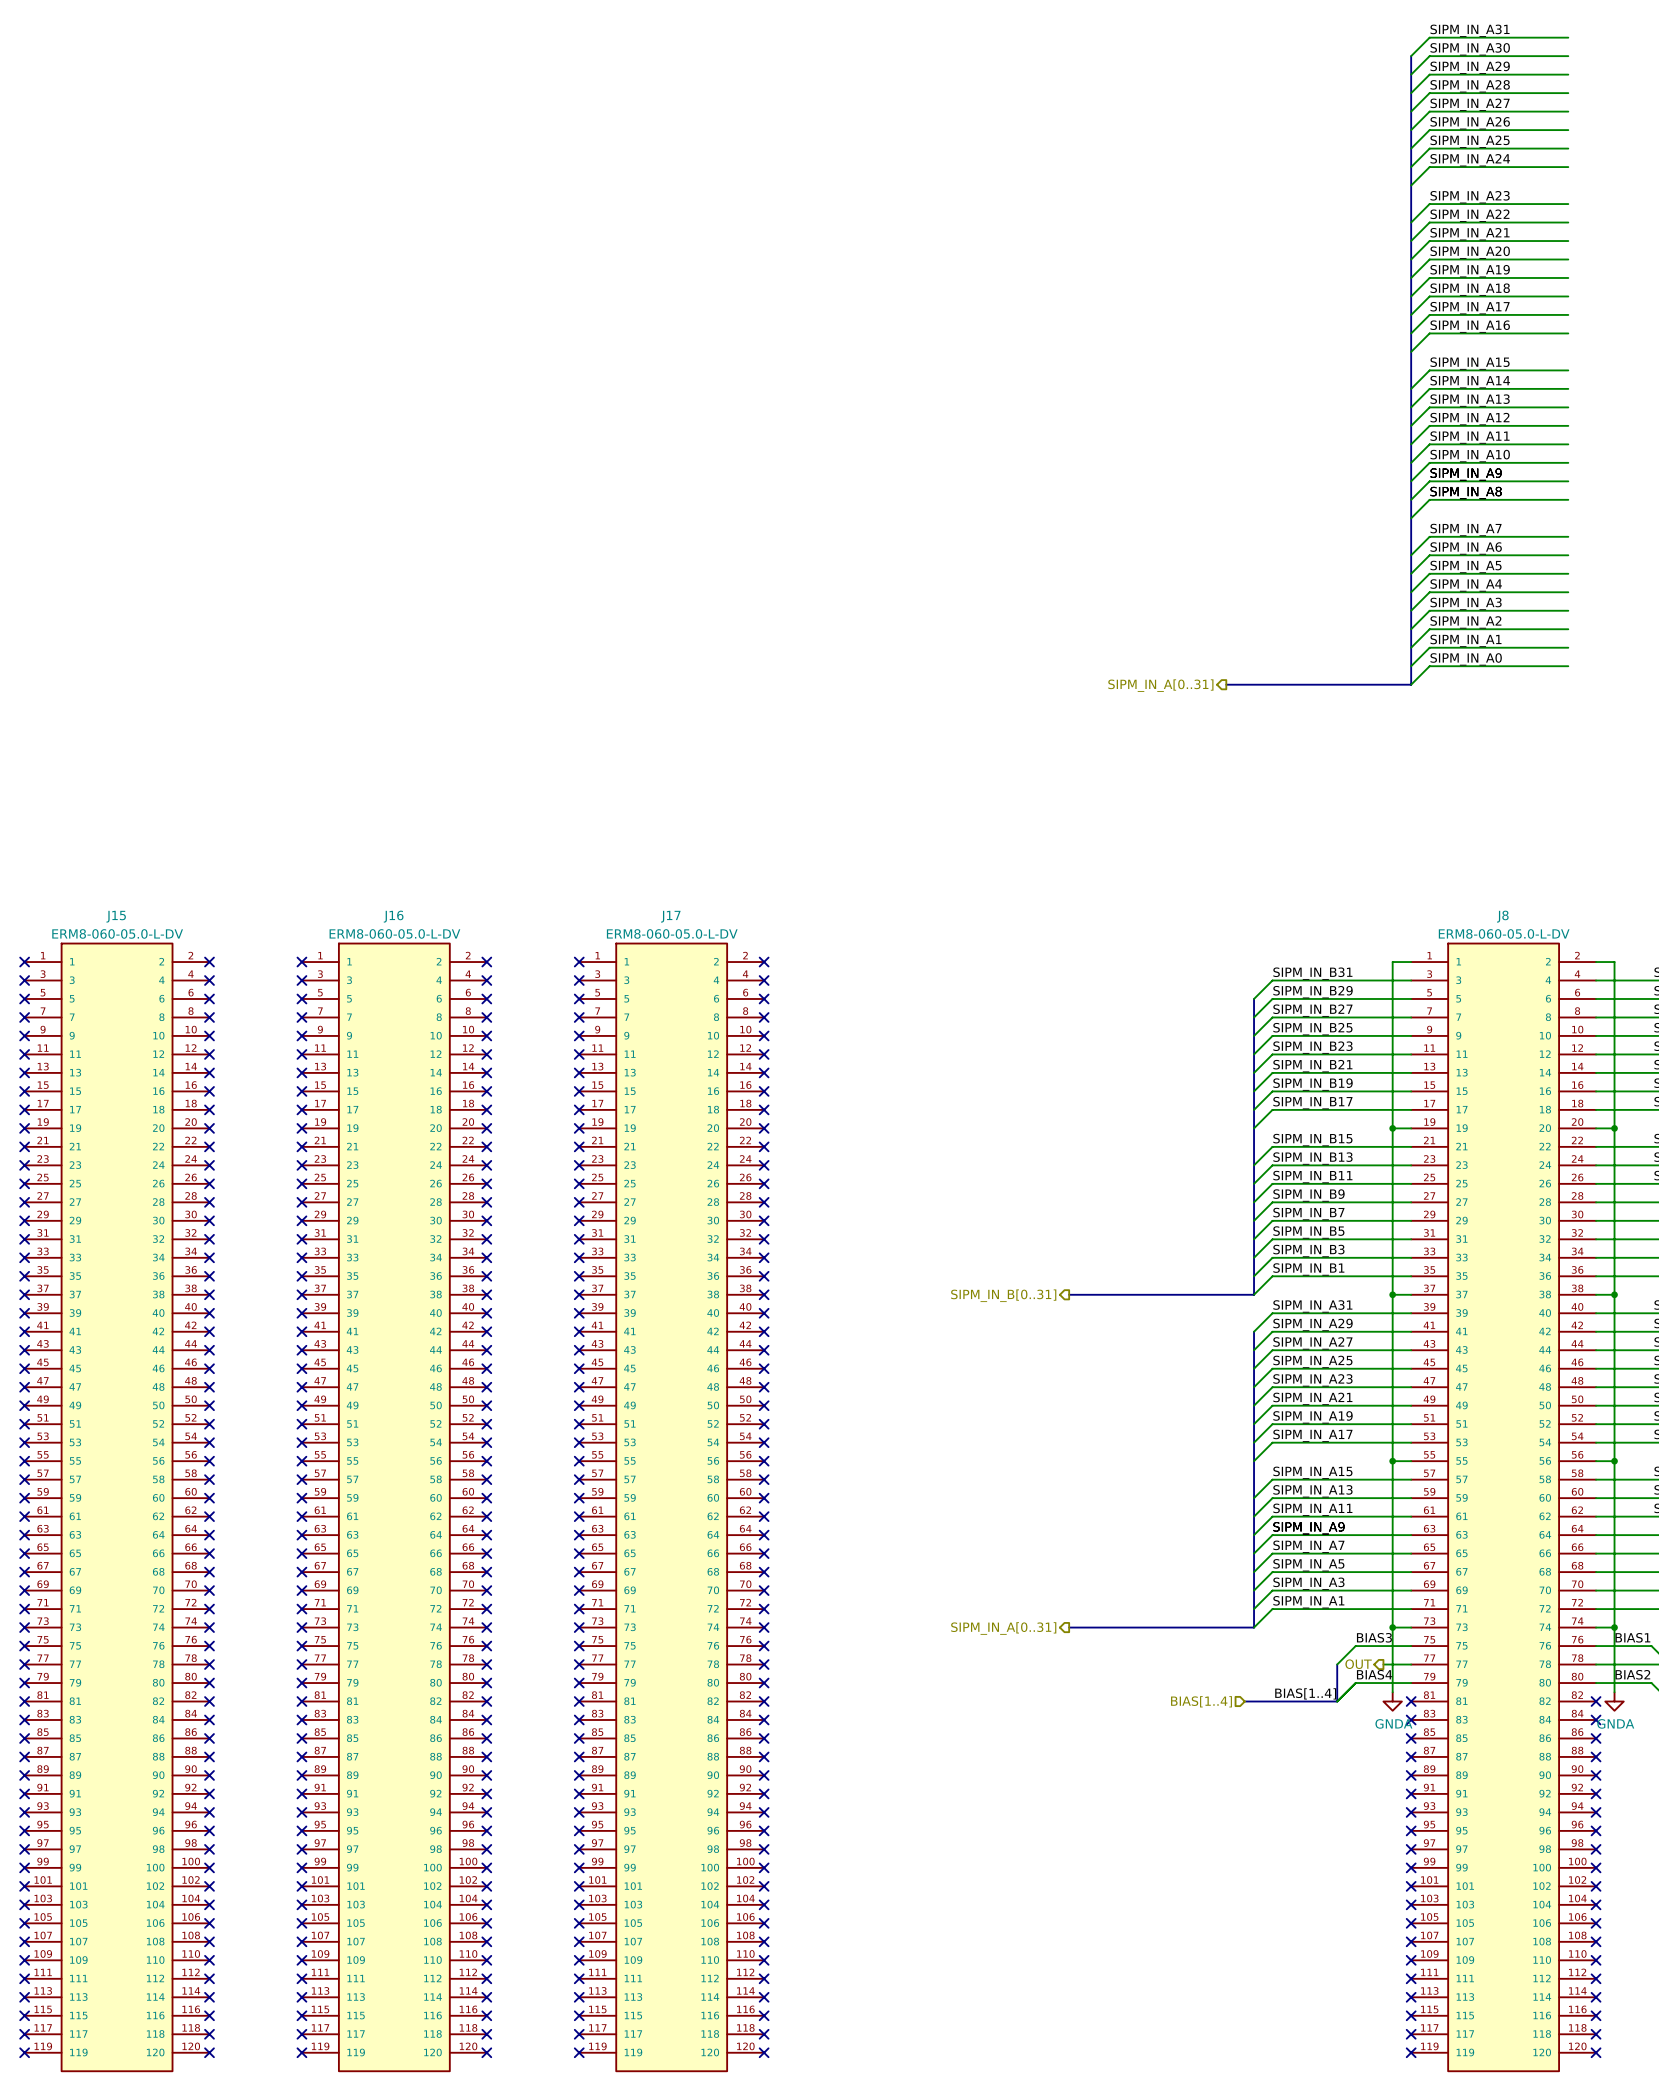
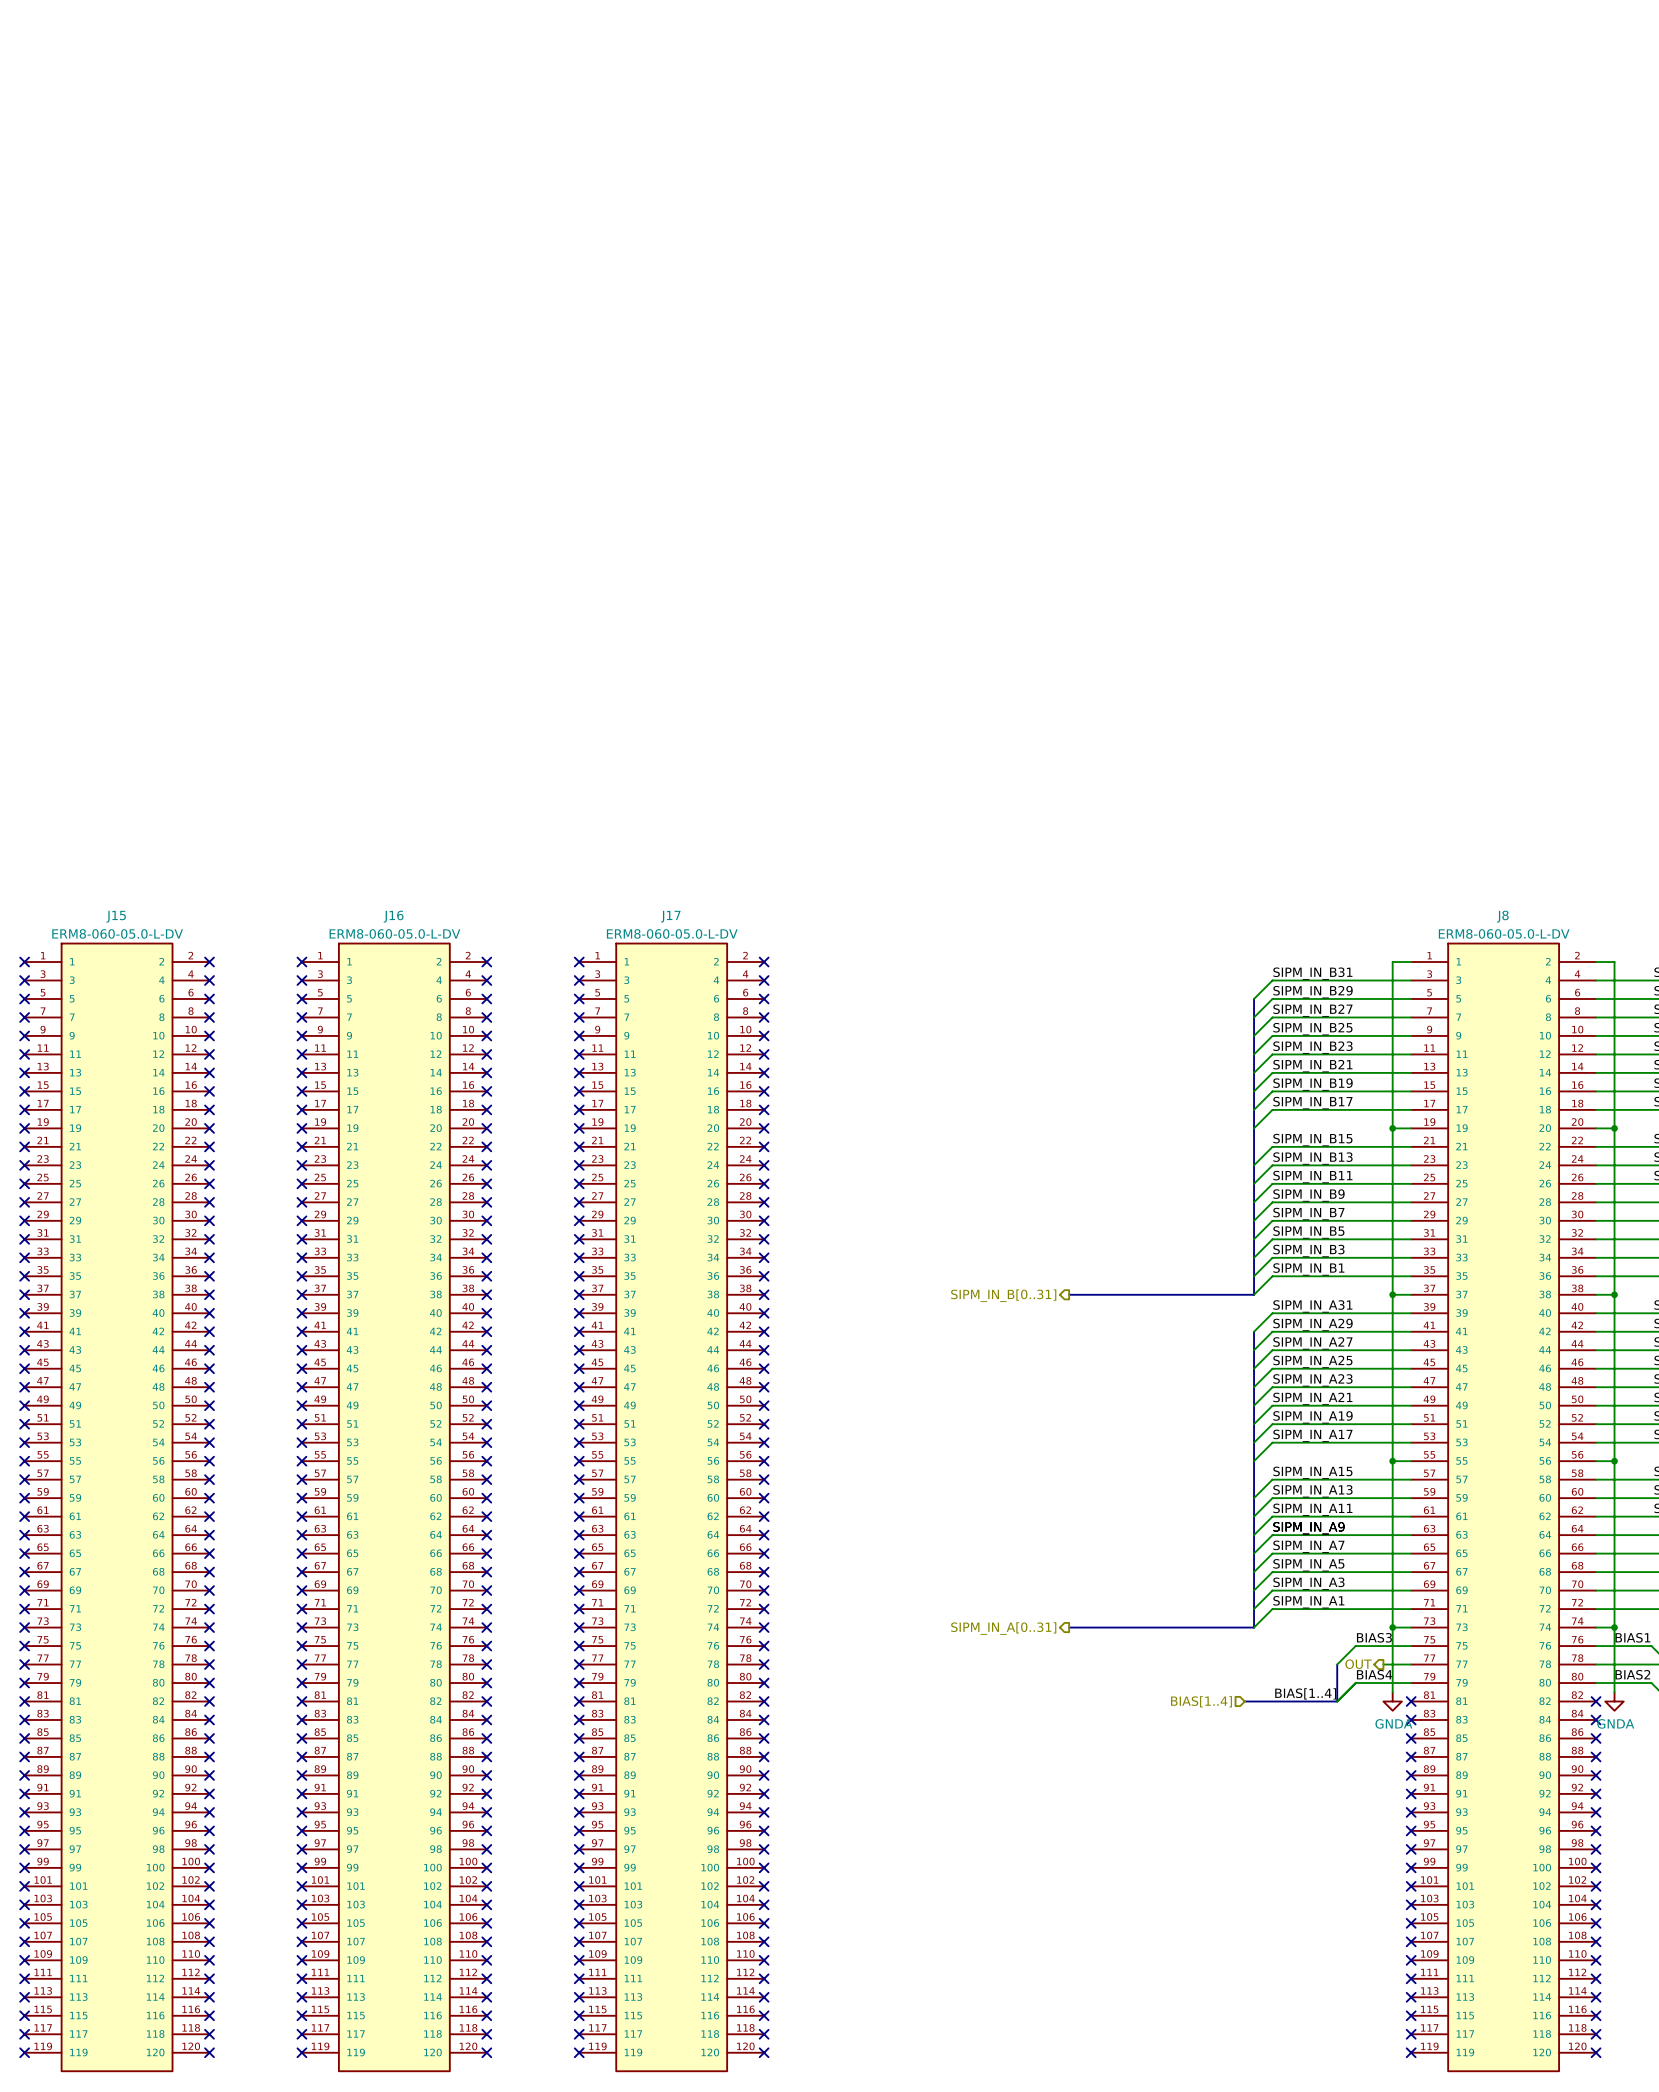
label: SIPM_IN_A31 (1470, 30) -> none
wire: (1568, 37) (1429, 37) (1411, 56) -> none
label: SIPM_IN_A30 (1470, 49) -> none
bus: (1411, 56) (1411, 684) (1226, 684) -> none
wire: (1568, 56) (1429, 56) (1411, 74) -> none
label: SIPM_IN_A29 (1470, 67) -> none
wire: (1568, 74) (1429, 74) (1411, 93) -> none
label: SIPM_IN_A28 (1470, 86) -> none
wire: (1568, 93) (1429, 93) (1411, 111) -> none
label: SIPM_IN_A27 (1470, 104) -> none
wire: (1568, 111) (1429, 111) (1411, 130) -> none
label: SIPM_IN_A26 (1470, 123) -> none
wire: (1568, 130) (1429, 130) (1411, 148) -> none
label: SIPM_IN_A25 (1470, 141) -> none
wire: (1568, 148) (1429, 148) (1411, 167) -> none
label: SIPM_IN_A24 (1470, 160) -> none
wire: (1568, 167) (1429, 167) (1411, 185) -> none
label: SIPM_IN_A23 (1470, 197) -> none
wire: (1568, 204) (1429, 204) (1411, 222) -> none
label: SIPM_IN_A22 (1469, 215) -> none
wire: (1568, 222) (1429, 222) (1411, 241) -> none
label: SIPM_IN_A21 (1470, 234) -> none
wire: (1568, 241) (1429, 241) (1411, 259) -> none
label: SIPM_IN_A20 (1470, 252) -> none
wire: (1568, 259) (1429, 259) (1411, 277) -> none
label: SIPM_IN_A19 (1470, 271) -> none
wire: (1568, 277) (1429, 277) (1411, 296) -> none
label: SIPM_IN_A18 (1470, 289) -> none
wire: (1568, 296) (1429, 296) (1411, 314) -> none
label: SIPM_IN_A17 (1470, 308) -> none
wire: (1568, 314) (1429, 314) (1411, 333) -> none
label: SIPM_IN_A16 (1470, 326) -> none
wire: (1568, 333) (1429, 333) (1411, 351) -> none
label: SIPM_IN_A15 (1470, 363) -> none
wire: (1568, 370) (1429, 370) (1411, 388) -> none
label: SIPM_IN_A14 (1470, 382) -> none
wire: (1568, 388) (1429, 388) (1411, 407) -> none
label: SIPM_IN_A13 (1470, 400) -> none
wire: (1568, 407) (1429, 407) (1411, 425) -> none
label: SIPM_IN_A12 (1469, 419) -> none
wire: (1568, 425) (1429, 425) (1411, 444) -> none
label: SIPM_IN_A11 (1470, 437) -> none
wire: (1568, 444) (1429, 444) (1411, 462) -> none
label: SIPM_IN_A10 (1470, 456) -> none
wire: (1568, 462) (1429, 462) (1411, 481) -> none
label: SIPM_IN_A9 (1466, 474) -> none
wire: (1568, 481) (1429, 481) (1411, 499) -> none
label: SIPM_IN_A8 (1466, 493) -> none
wire: (1568, 499) (1429, 499) (1411, 518) -> none
label: SIPM_IN_A7 (1466, 529) -> none
wire: (1568, 536) (1429, 536) (1411, 555) -> none
label: SIPM_IN_A6 (1466, 548) -> none
wire: (1568, 555) (1429, 555) (1411, 573) -> none
label: SIPM_IN_A5 (1466, 566) -> none
wire: (1568, 573) (1429, 573) (1411, 592) -> none
label: SIPM_IN_A4 (1466, 585) -> none
wire: (1568, 592) (1429, 592) (1411, 610) -> none
label: SIPM_IN_A3 (1466, 603) -> none
wire: (1568, 610) (1429, 610) (1411, 629) -> none
label: SIPM_IN_A2 (1465, 622) -> none
wire: (1568, 629) (1429, 629) (1411, 647) -> none
label: SIPM_IN_A1 (1465, 640) -> none
wire: (1568, 647) (1429, 647) (1411, 666) -> none
label: SIPM_IN_A0 (1466, 659) -> none
wire: (1568, 666) (1429, 666) (1411, 684) -> none
hierarchical label: SIPM_IN_A[0..31] (1160, 685) -> none

